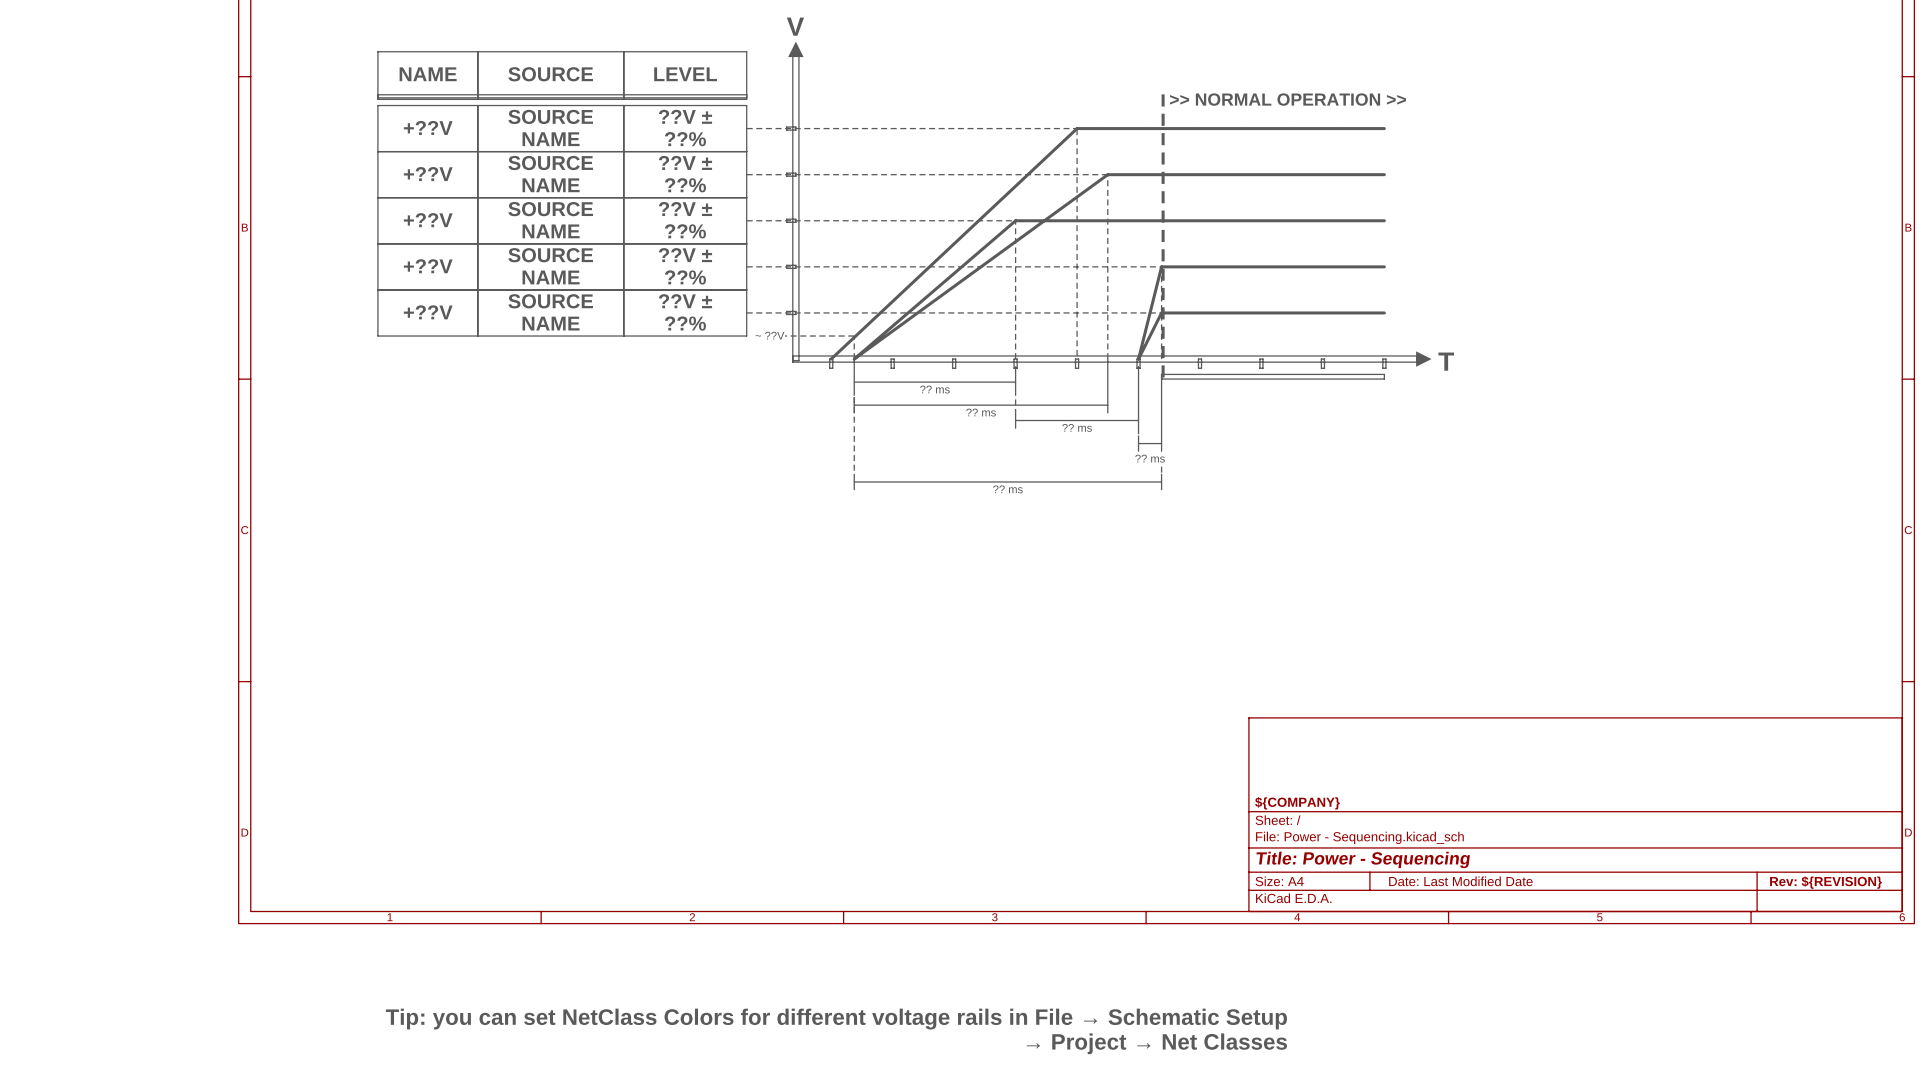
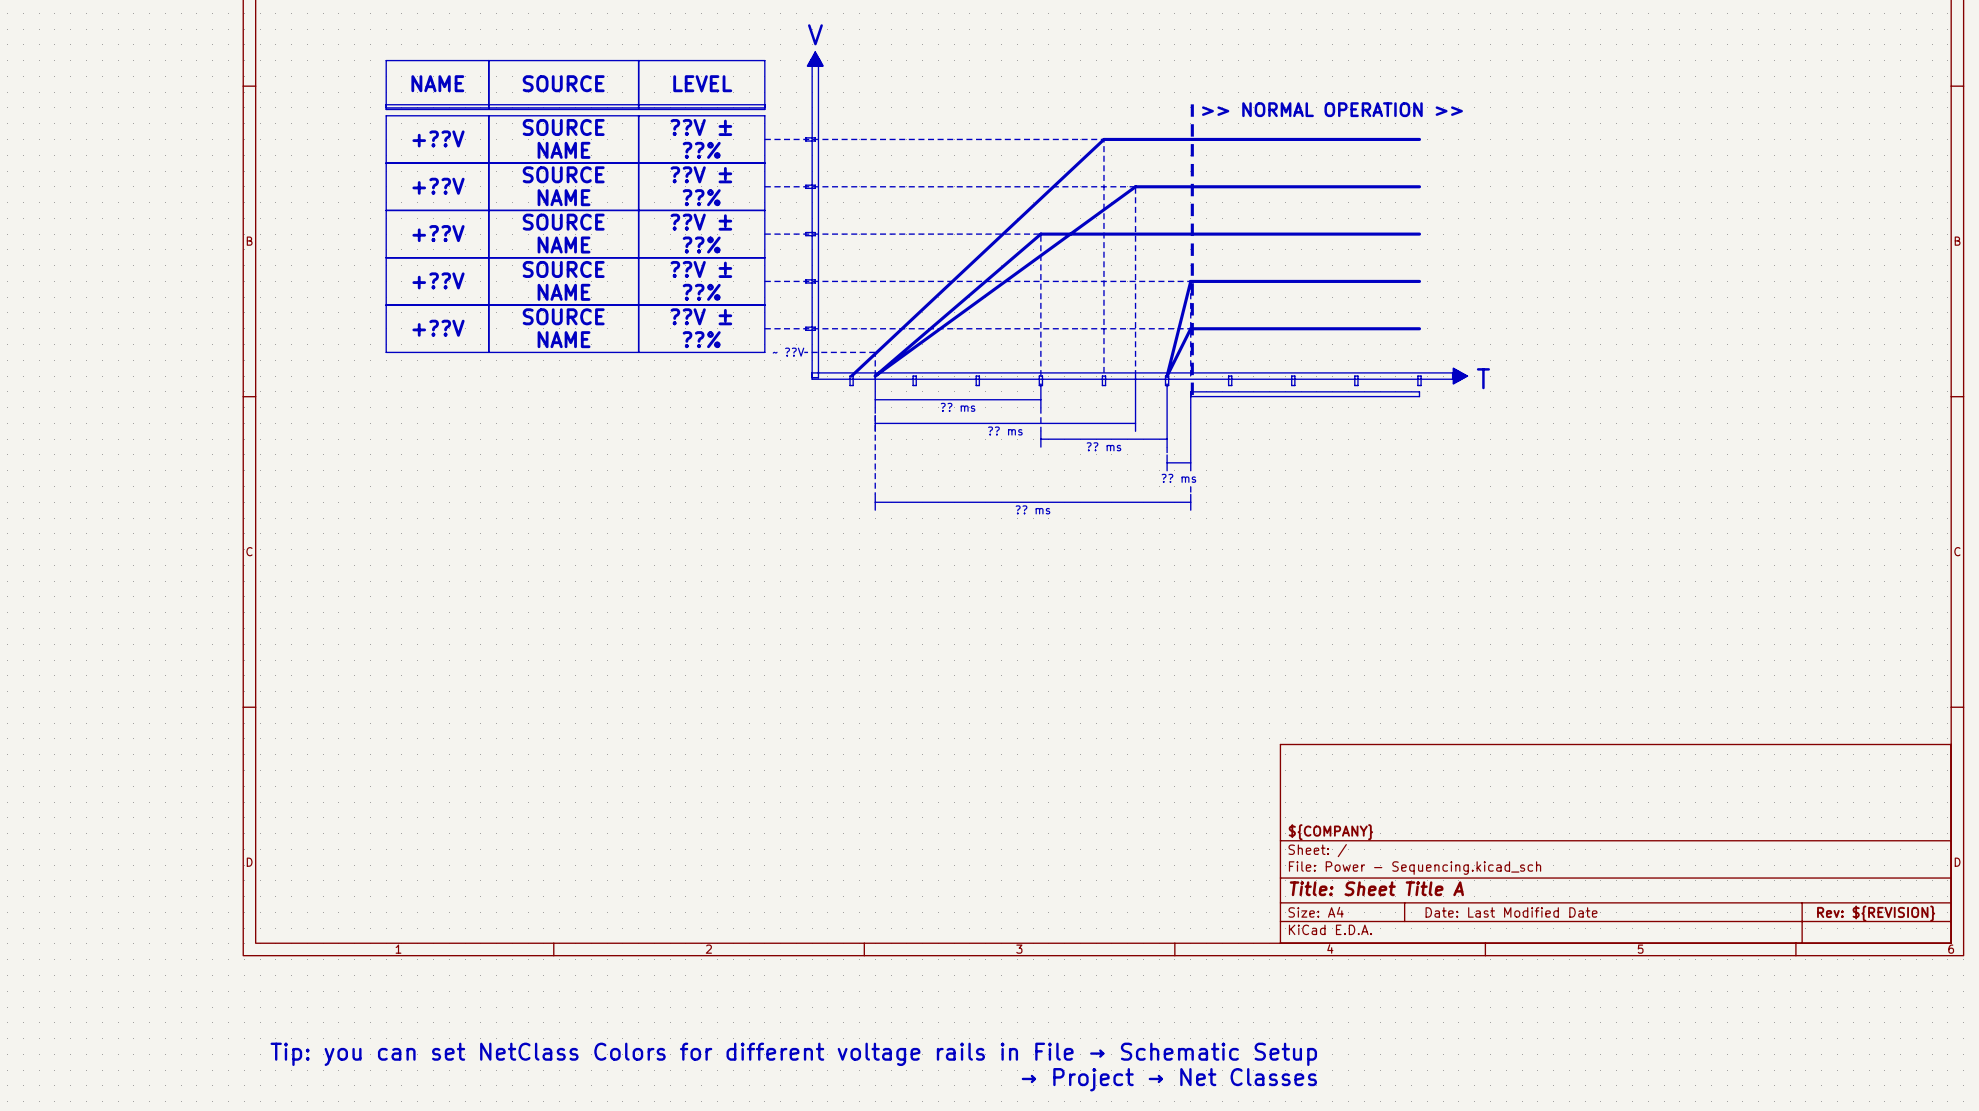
title block: Title: Power - Sequencing (1363, 859) -> Title: Sheet Title A (1376, 888)

